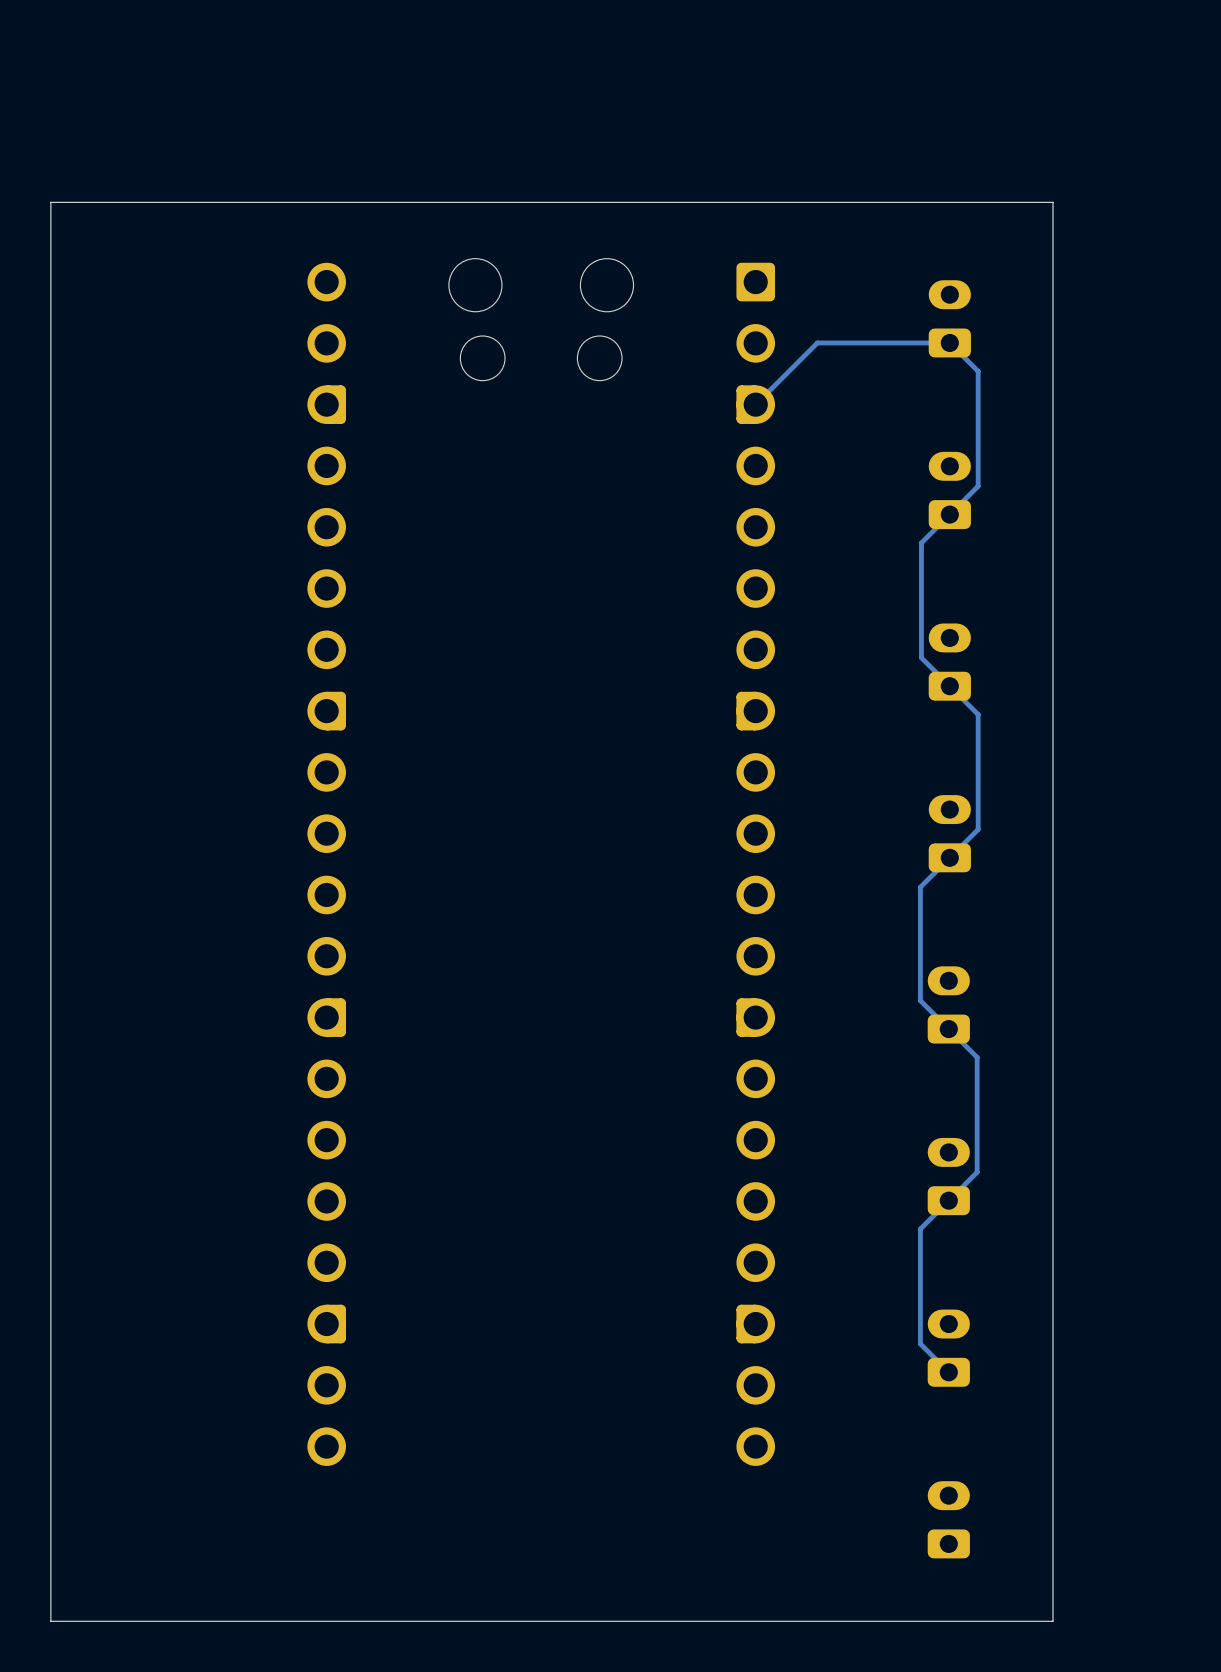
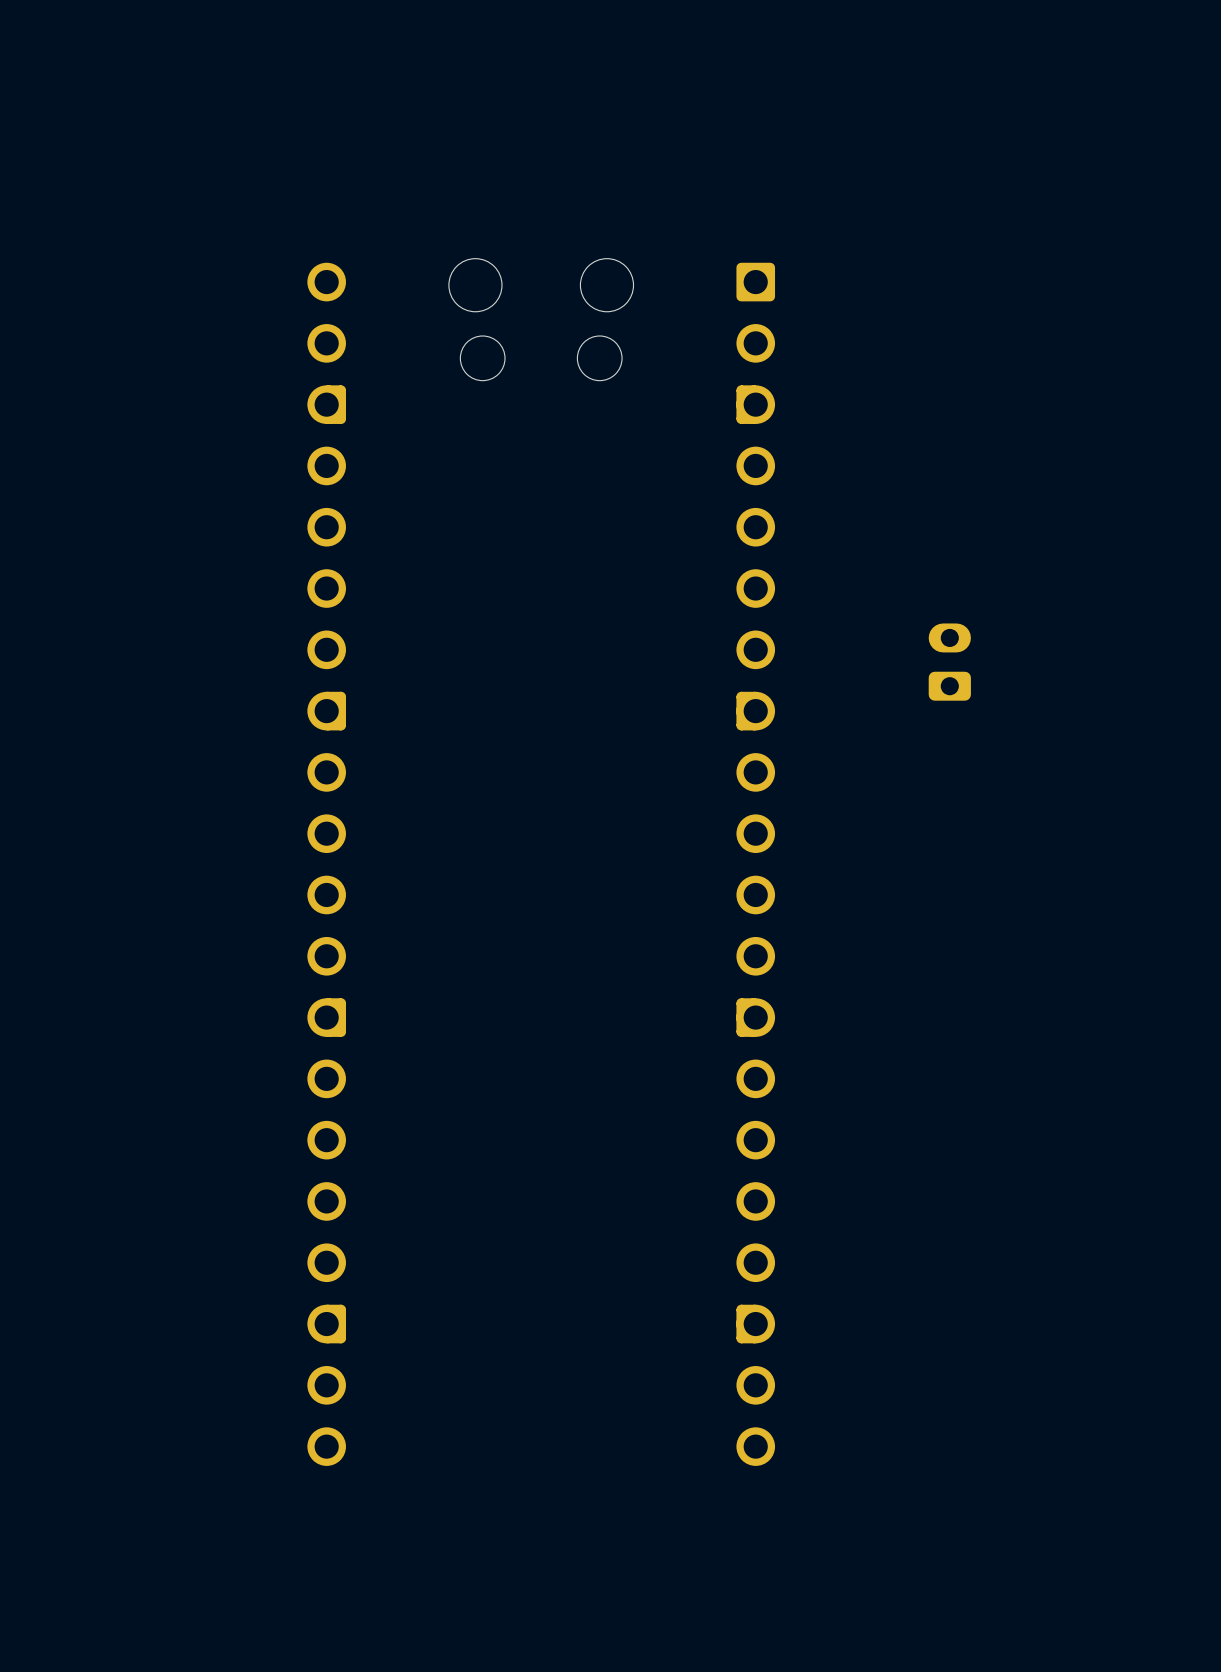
board edge: (1053, 202) (50, 202) (50, 1621) (1053, 1621) (1053, 202) -> none
part: (949, 318) -> none
track: (755, 404) (817, 342) (949, 342) (978, 371) (978, 486) (921, 542) (921, 657) (978, 714) (978, 829) (920, 887) (920, 1000) (977, 1057) (977, 1172) (920, 1229) (920, 1343) (948, 1372) -> none
part: (949, 490) -> none
part: (949, 833) -> none
part: (948, 1004) -> none
part: (948, 1176) -> none
part: (948, 1348) -> none
part: (948, 1519) -> none

